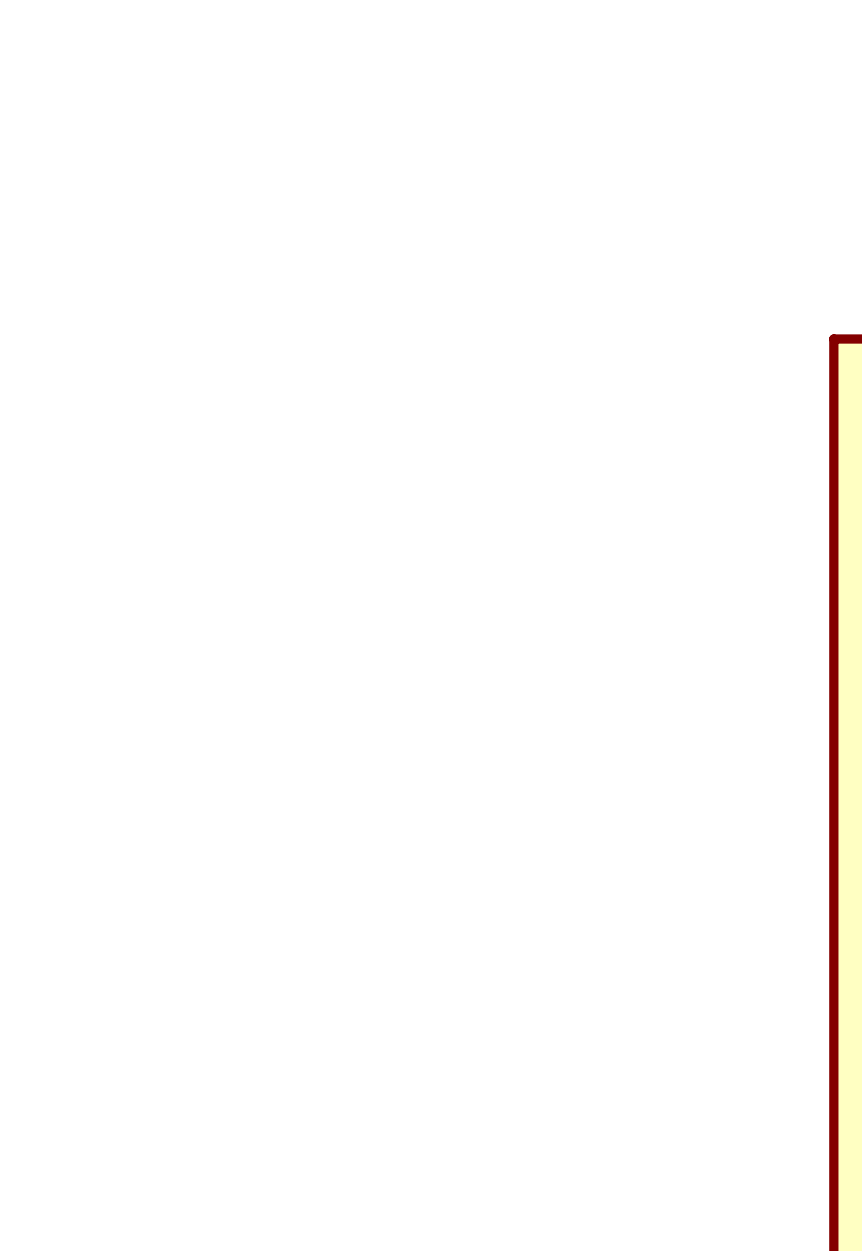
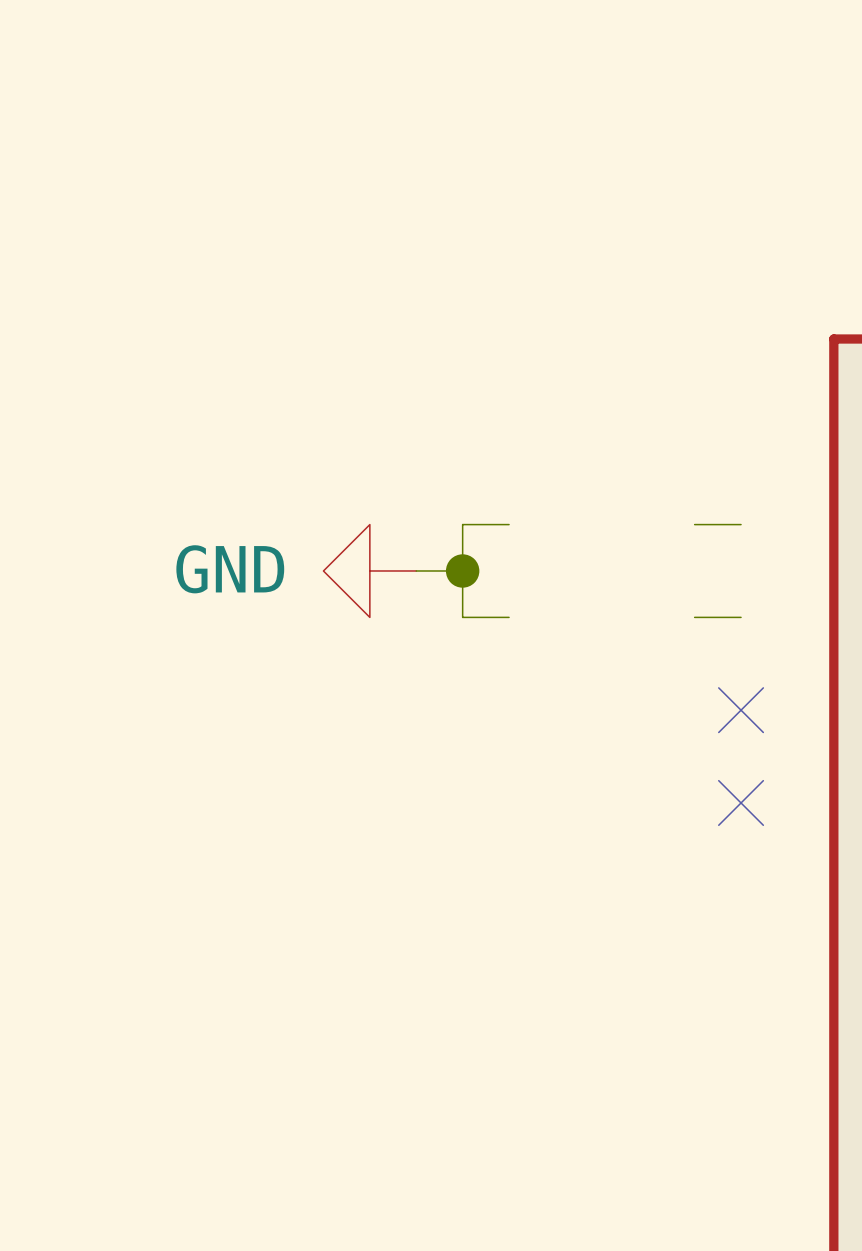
wire: none -> (509, 524) (462, 524) (462, 617) (509, 617)
wire: none -> (694, 524) (741, 524)
power symbol: none -> GND (369, 570)
wire: none -> (416, 570) (462, 570)
junction: none -> (462, 570)
wire: none -> (694, 617) (741, 617)
no-connect mark: none -> (741, 710)
no-connect mark: none -> (741, 802)

